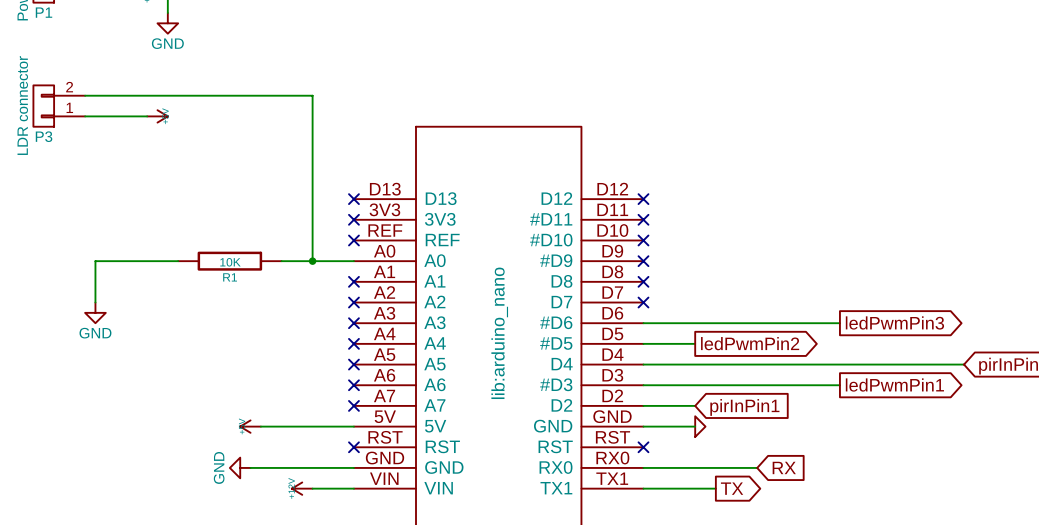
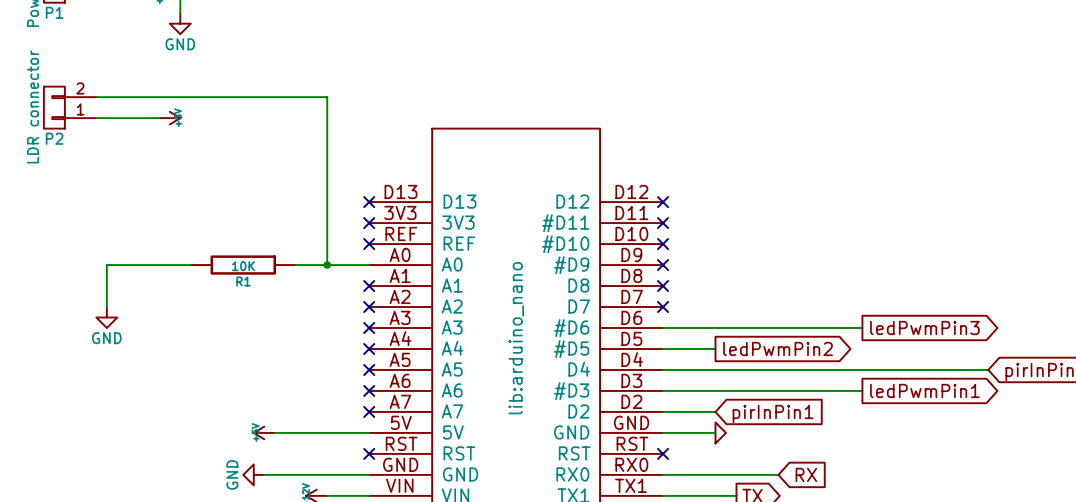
P3 name: P3 (44, 136) -> P2 (54, 138)

